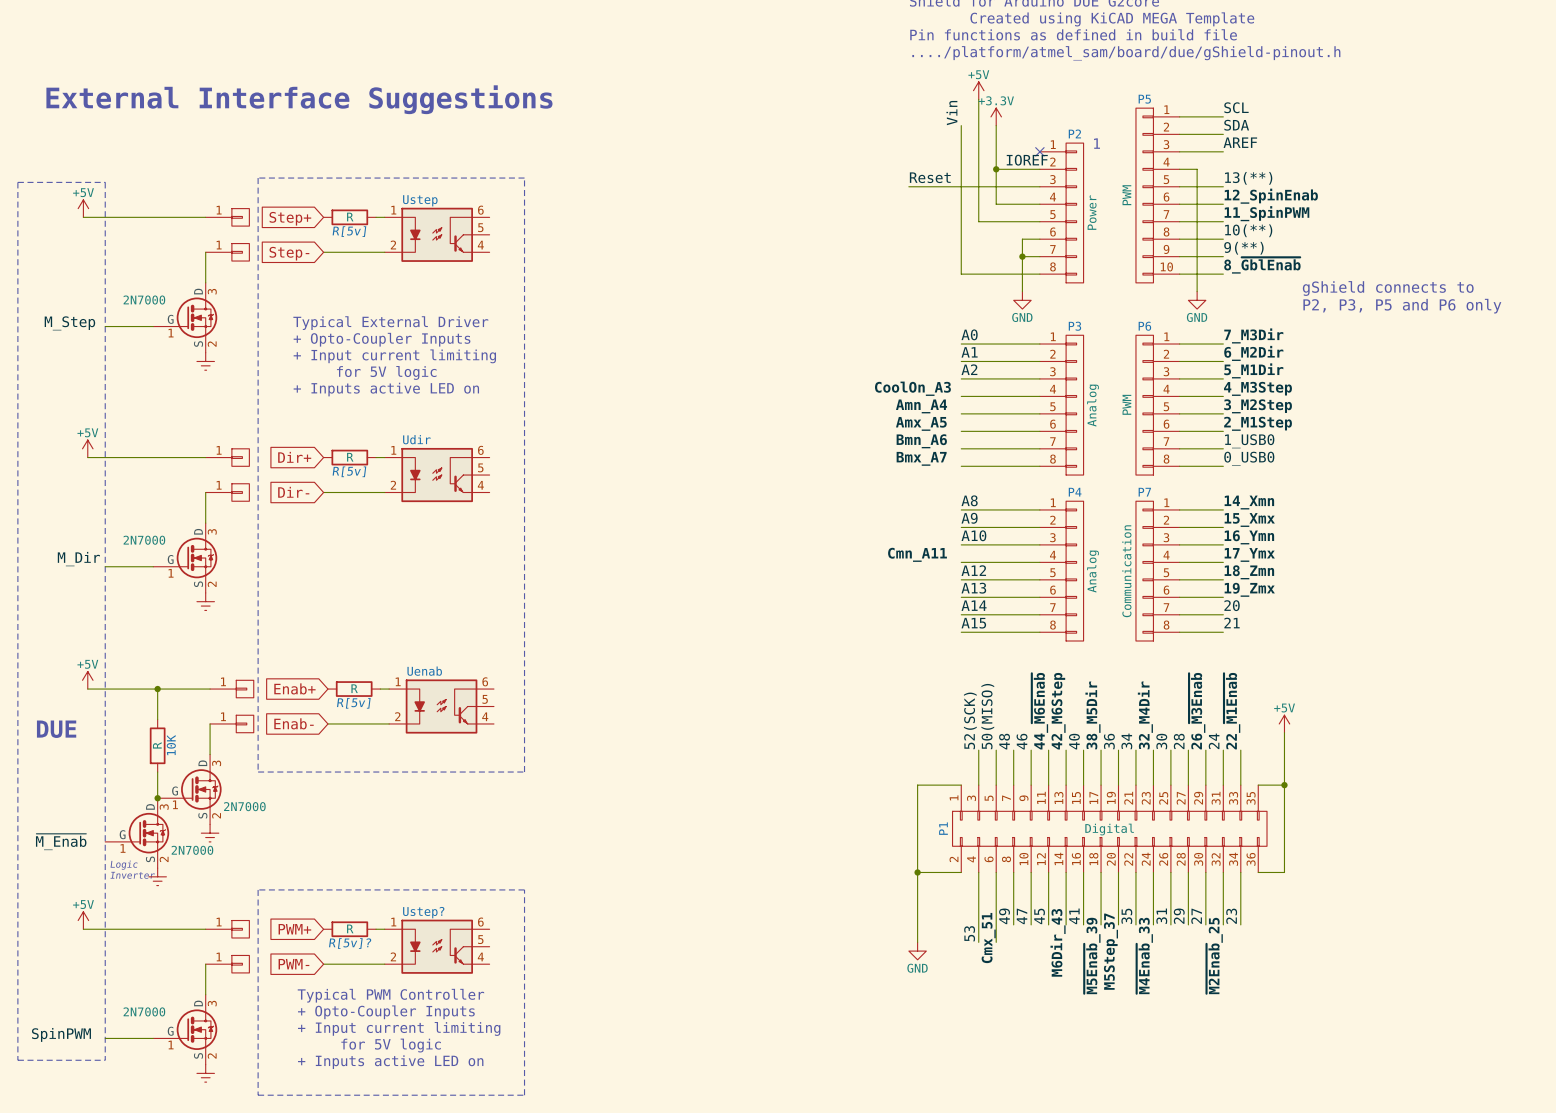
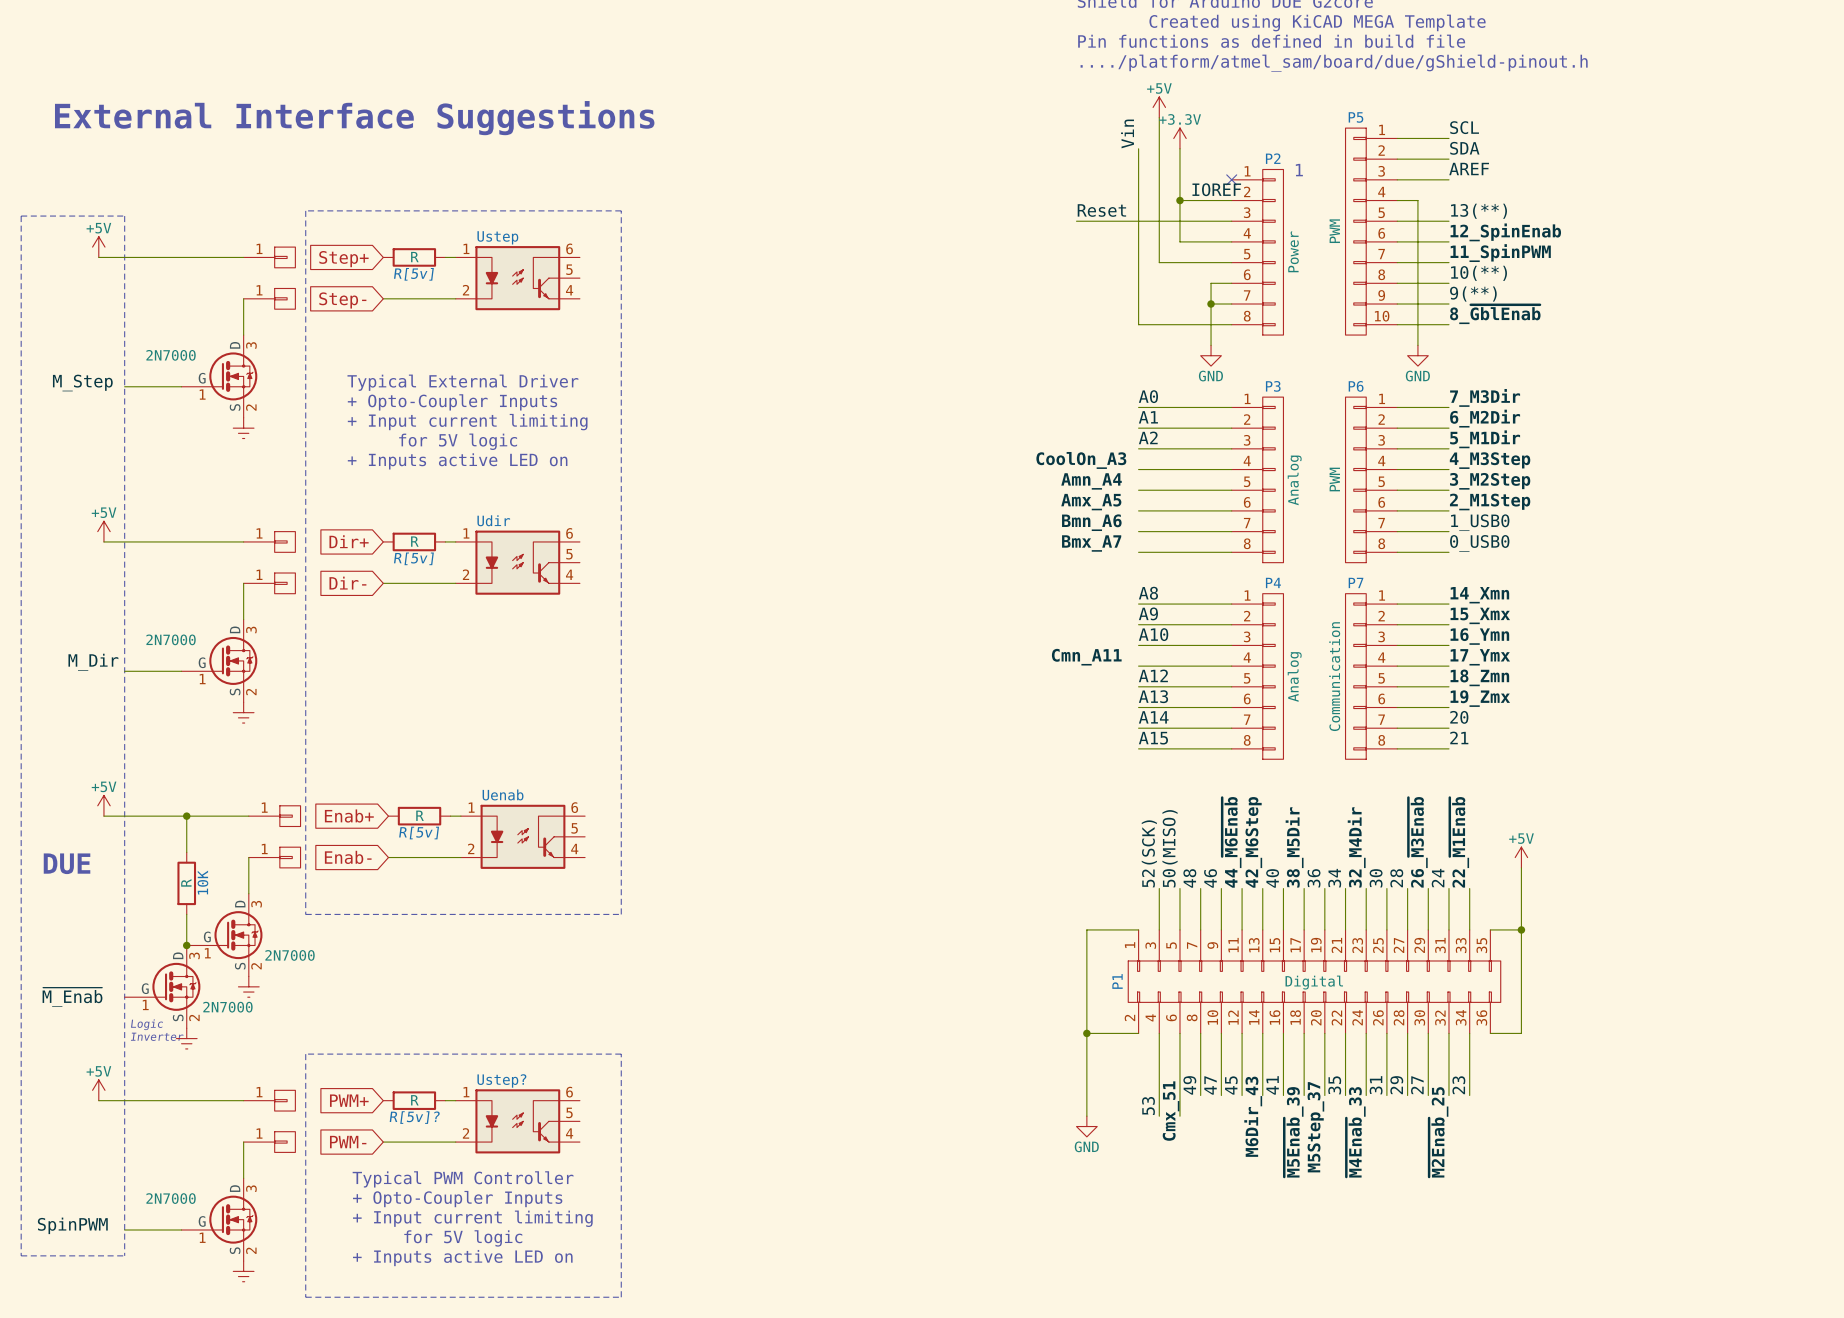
text: gShield connects to (1388, 288) -> none
text: P2, P3, P5 and P6 only (1402, 306) -> none

